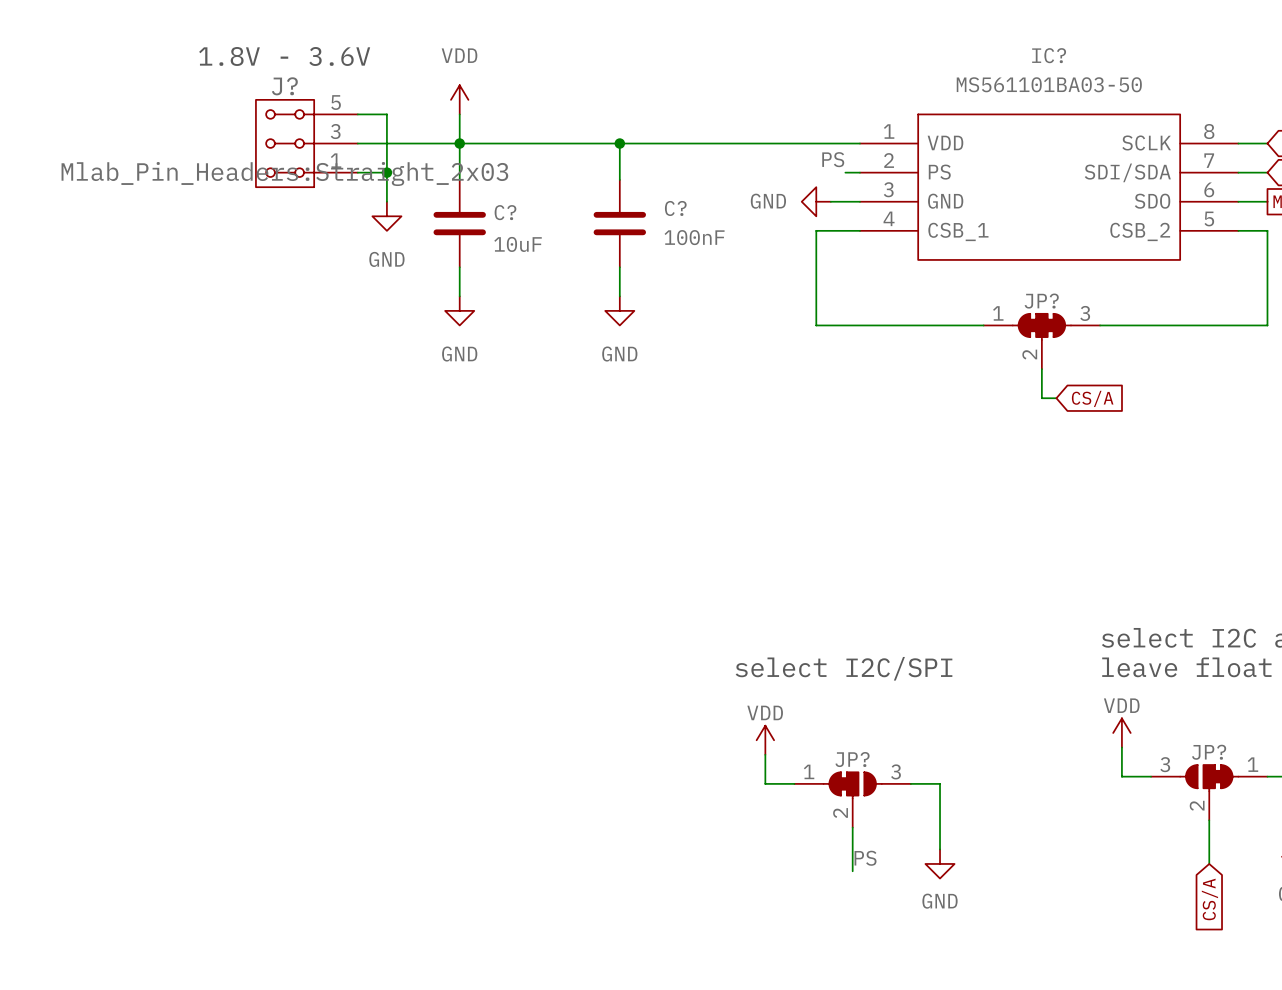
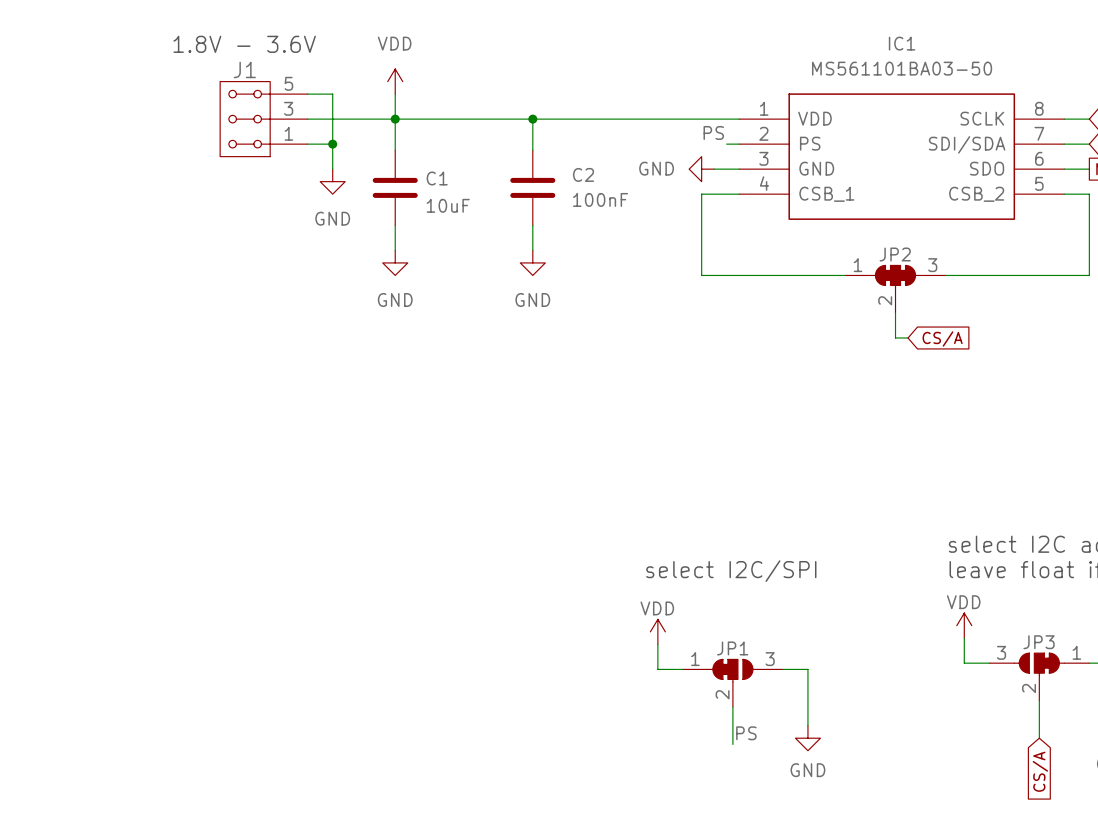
IC? name: IC? (1049, 55) -> IC1 (902, 43)
J? name: J? (284, 86) -> J1 (244, 69)
J? text: Mlab_Pin_Headers:Straight_2x03 (284, 174) -> none
C? name: C? (675, 208) -> C2 (583, 174)
C? name: C? (505, 212) -> C1 (437, 178)
JP? name: JP? (1041, 301) -> JP2 (895, 254)
JP? name: JP? (1209, 752) -> JP3 (1039, 642)
JP? name: JP? (852, 759) -> JP1 (732, 648)

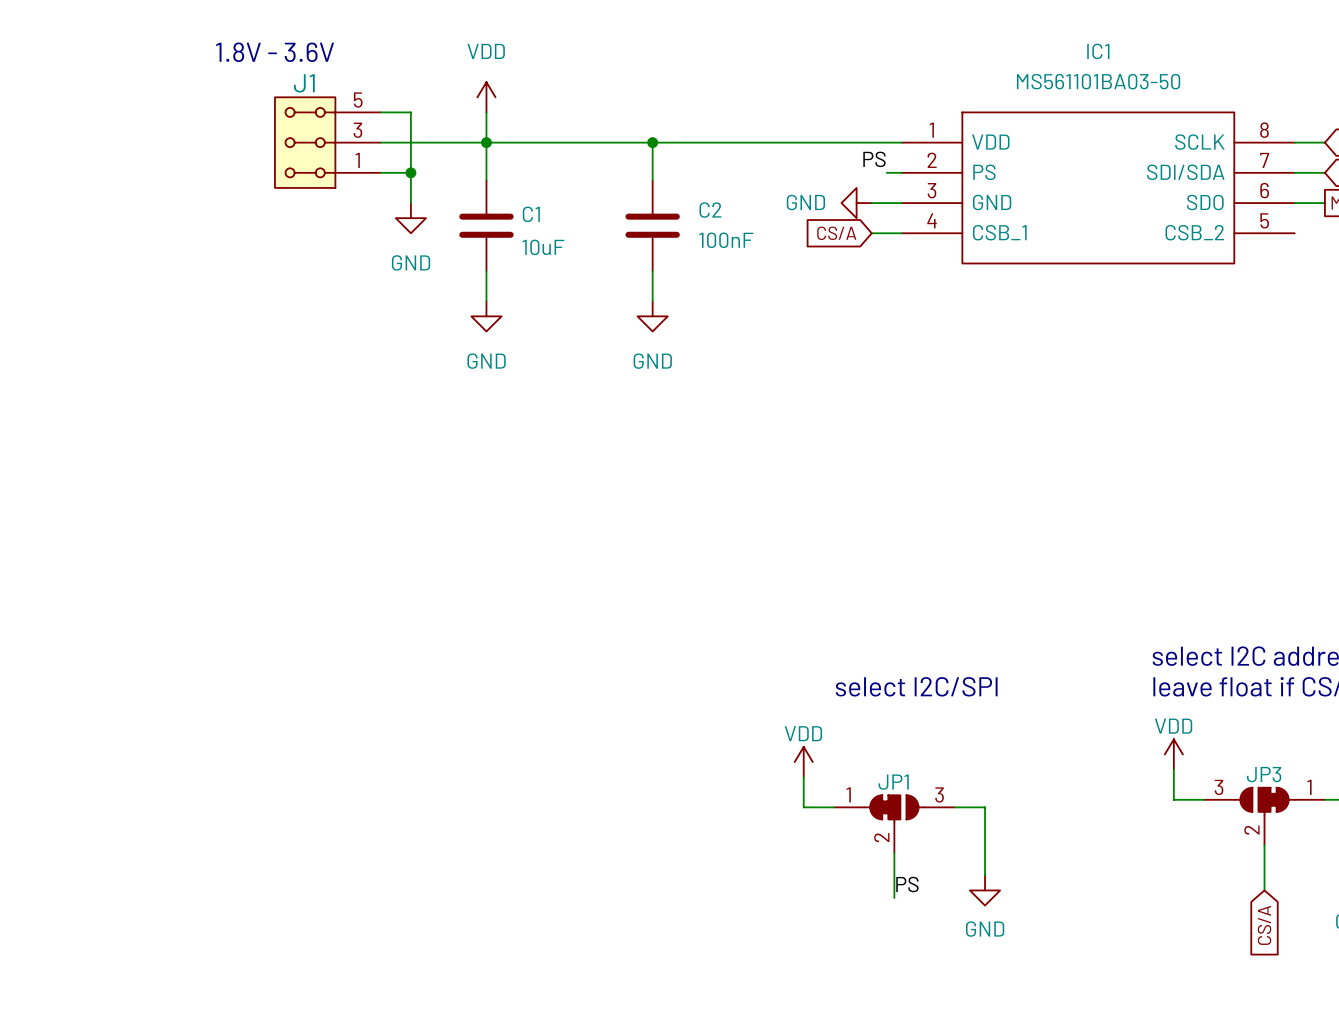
wire: (714, 194) (701, 194) (701, 275) (845, 275) -> none
wire: (1064, 194) (1089, 194) (1089, 275) (945, 275) -> none
JP2: (895, 289) -> none
wire: (895, 312) (895, 337) (908, 337) -> none
global label rotation: 0° (942, 339) -> 180° (836, 233)
global label position: CS/A (942, 339) -> CS/A (836, 233)

